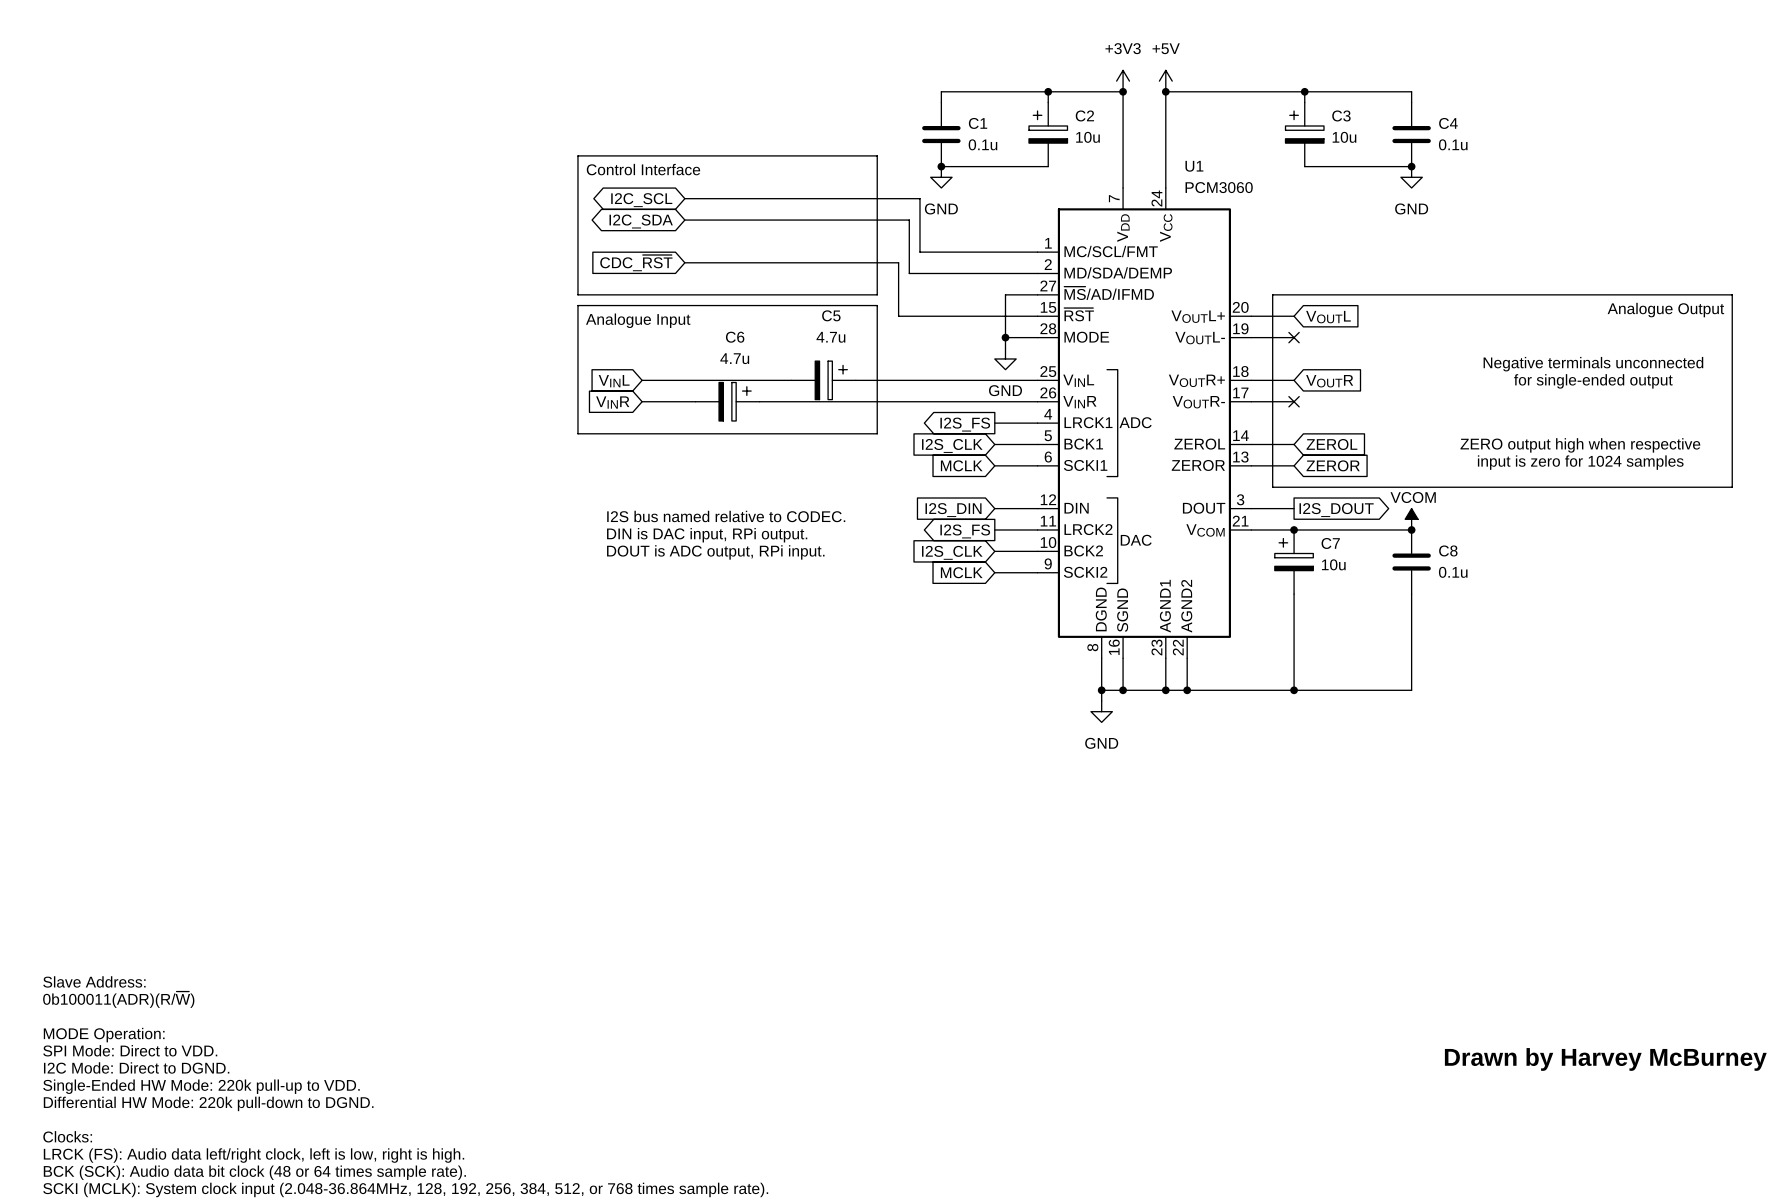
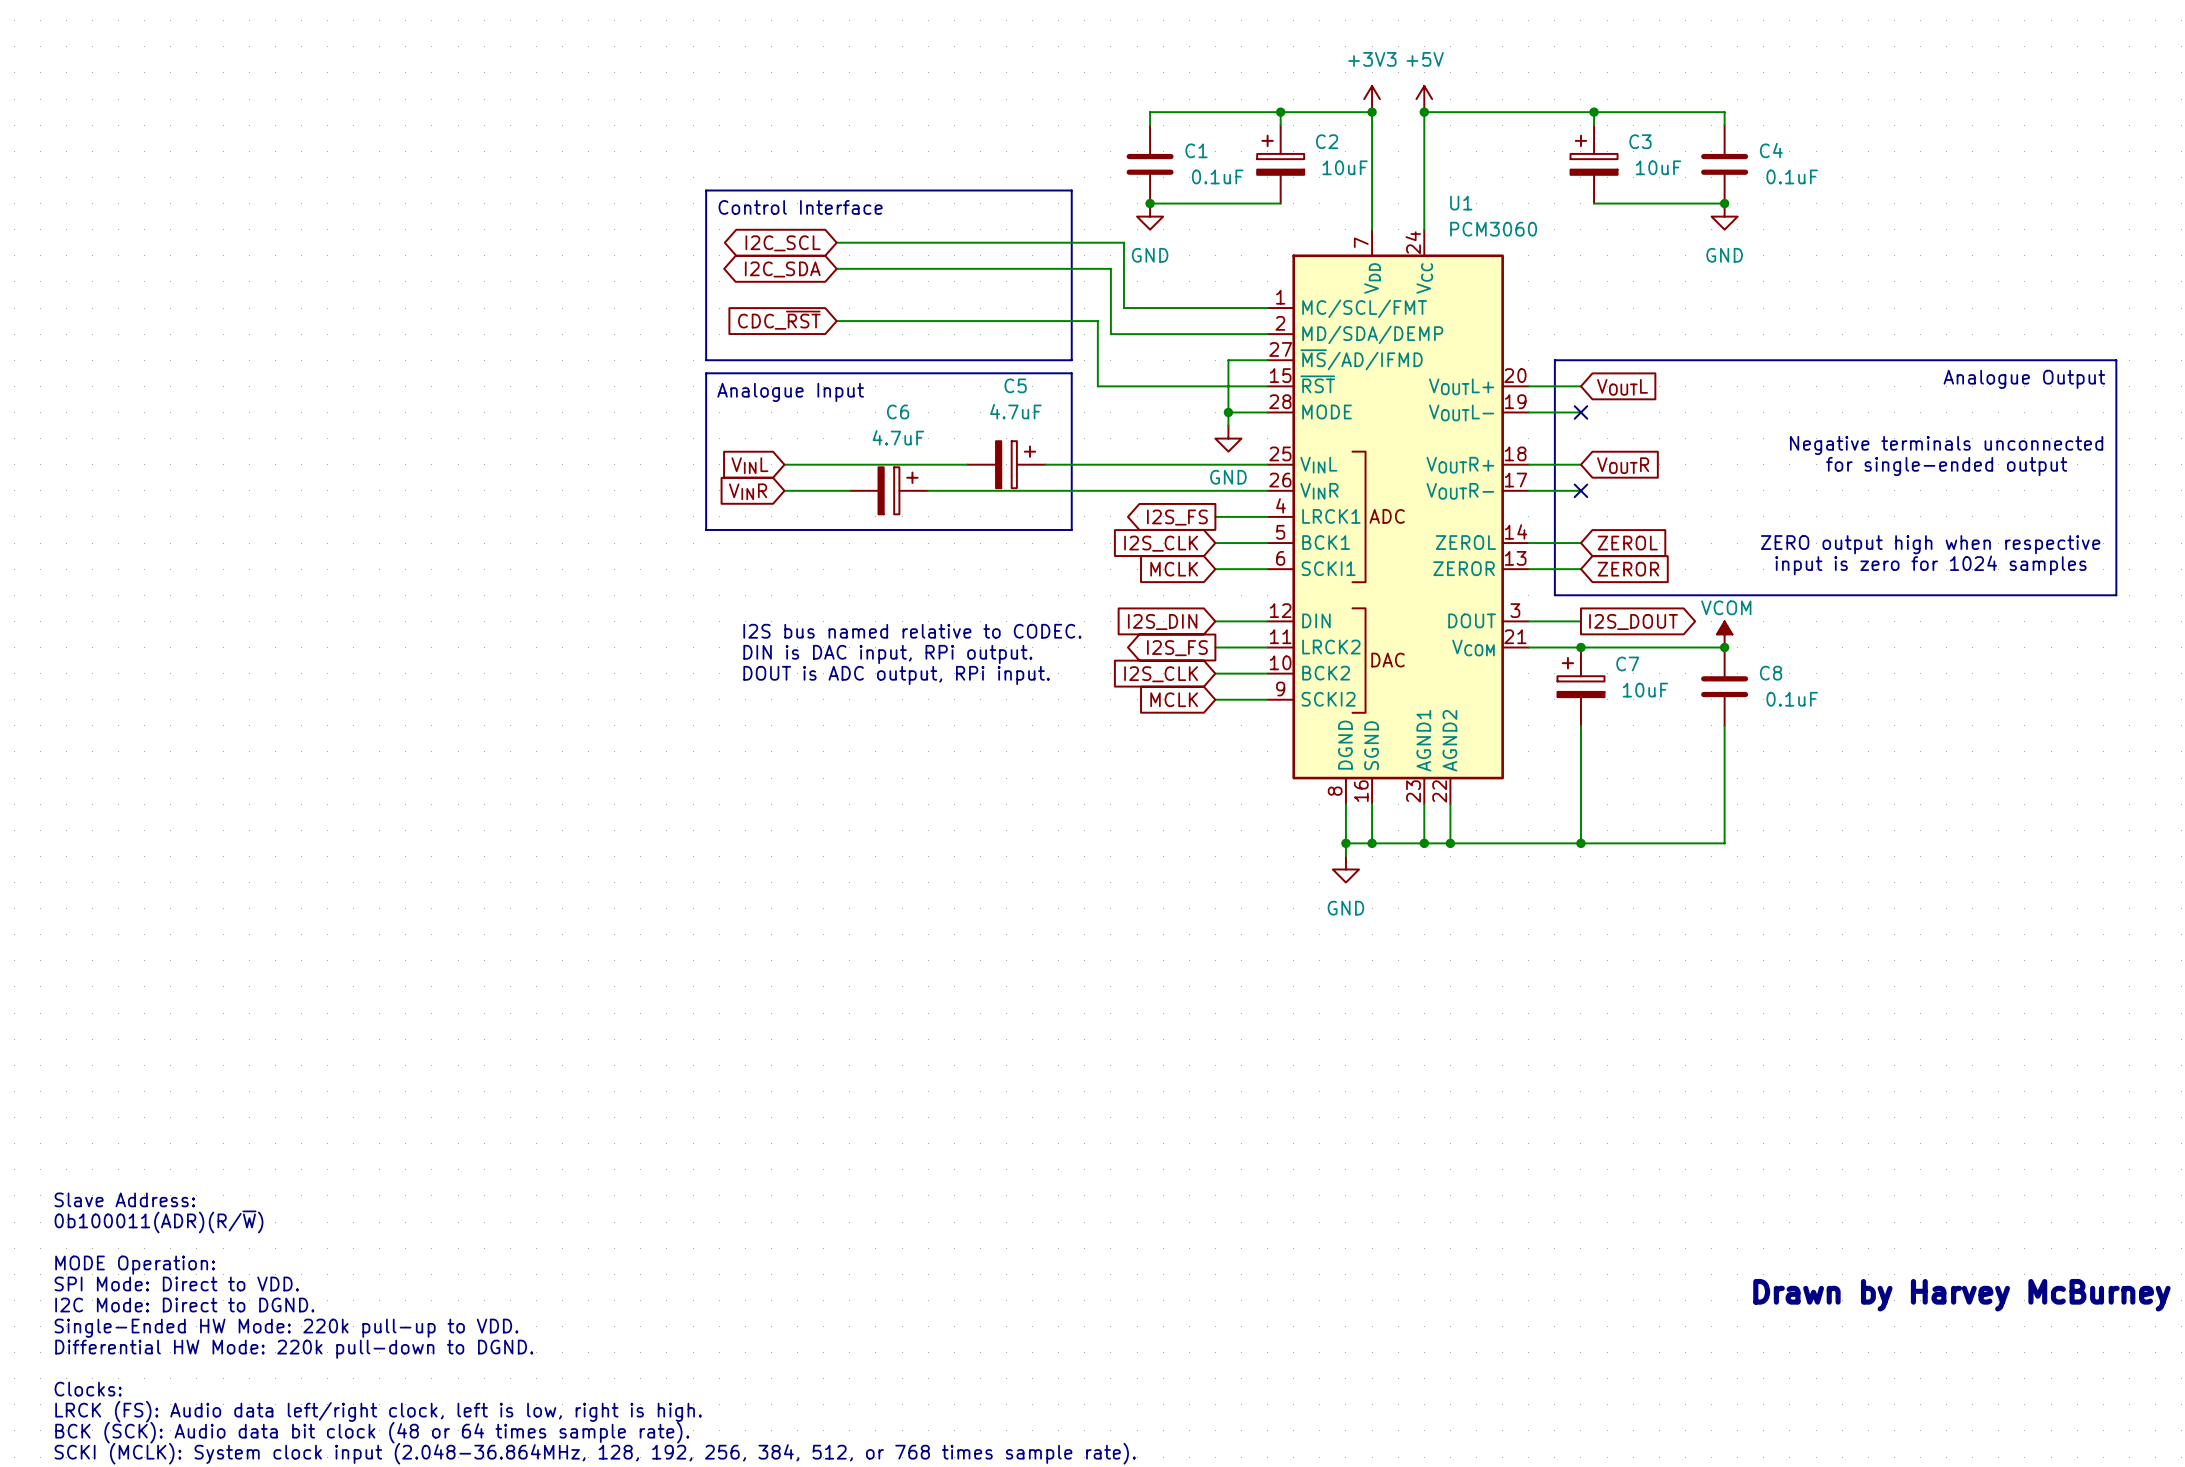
C2 value: 10u (1087, 137) -> 10uF (1345, 167)
C3 value: 10u (1344, 137) -> 10uF (1658, 167)
C1 value: 0.1u (982, 144) -> 0.1uF (1217, 176)
C4 value: 0.1u (1453, 144) -> 0.1uF (1792, 176)
C5 value: 4.7u (830, 337) -> 4.7uF (1015, 411)
C6 value: 4.7u (734, 358) -> 4.7uF (898, 437)
C7 value: 10u (1333, 564) -> 10uF (1645, 690)
C8 value: 0.1u (1453, 572) -> 0.1uF (1792, 699)

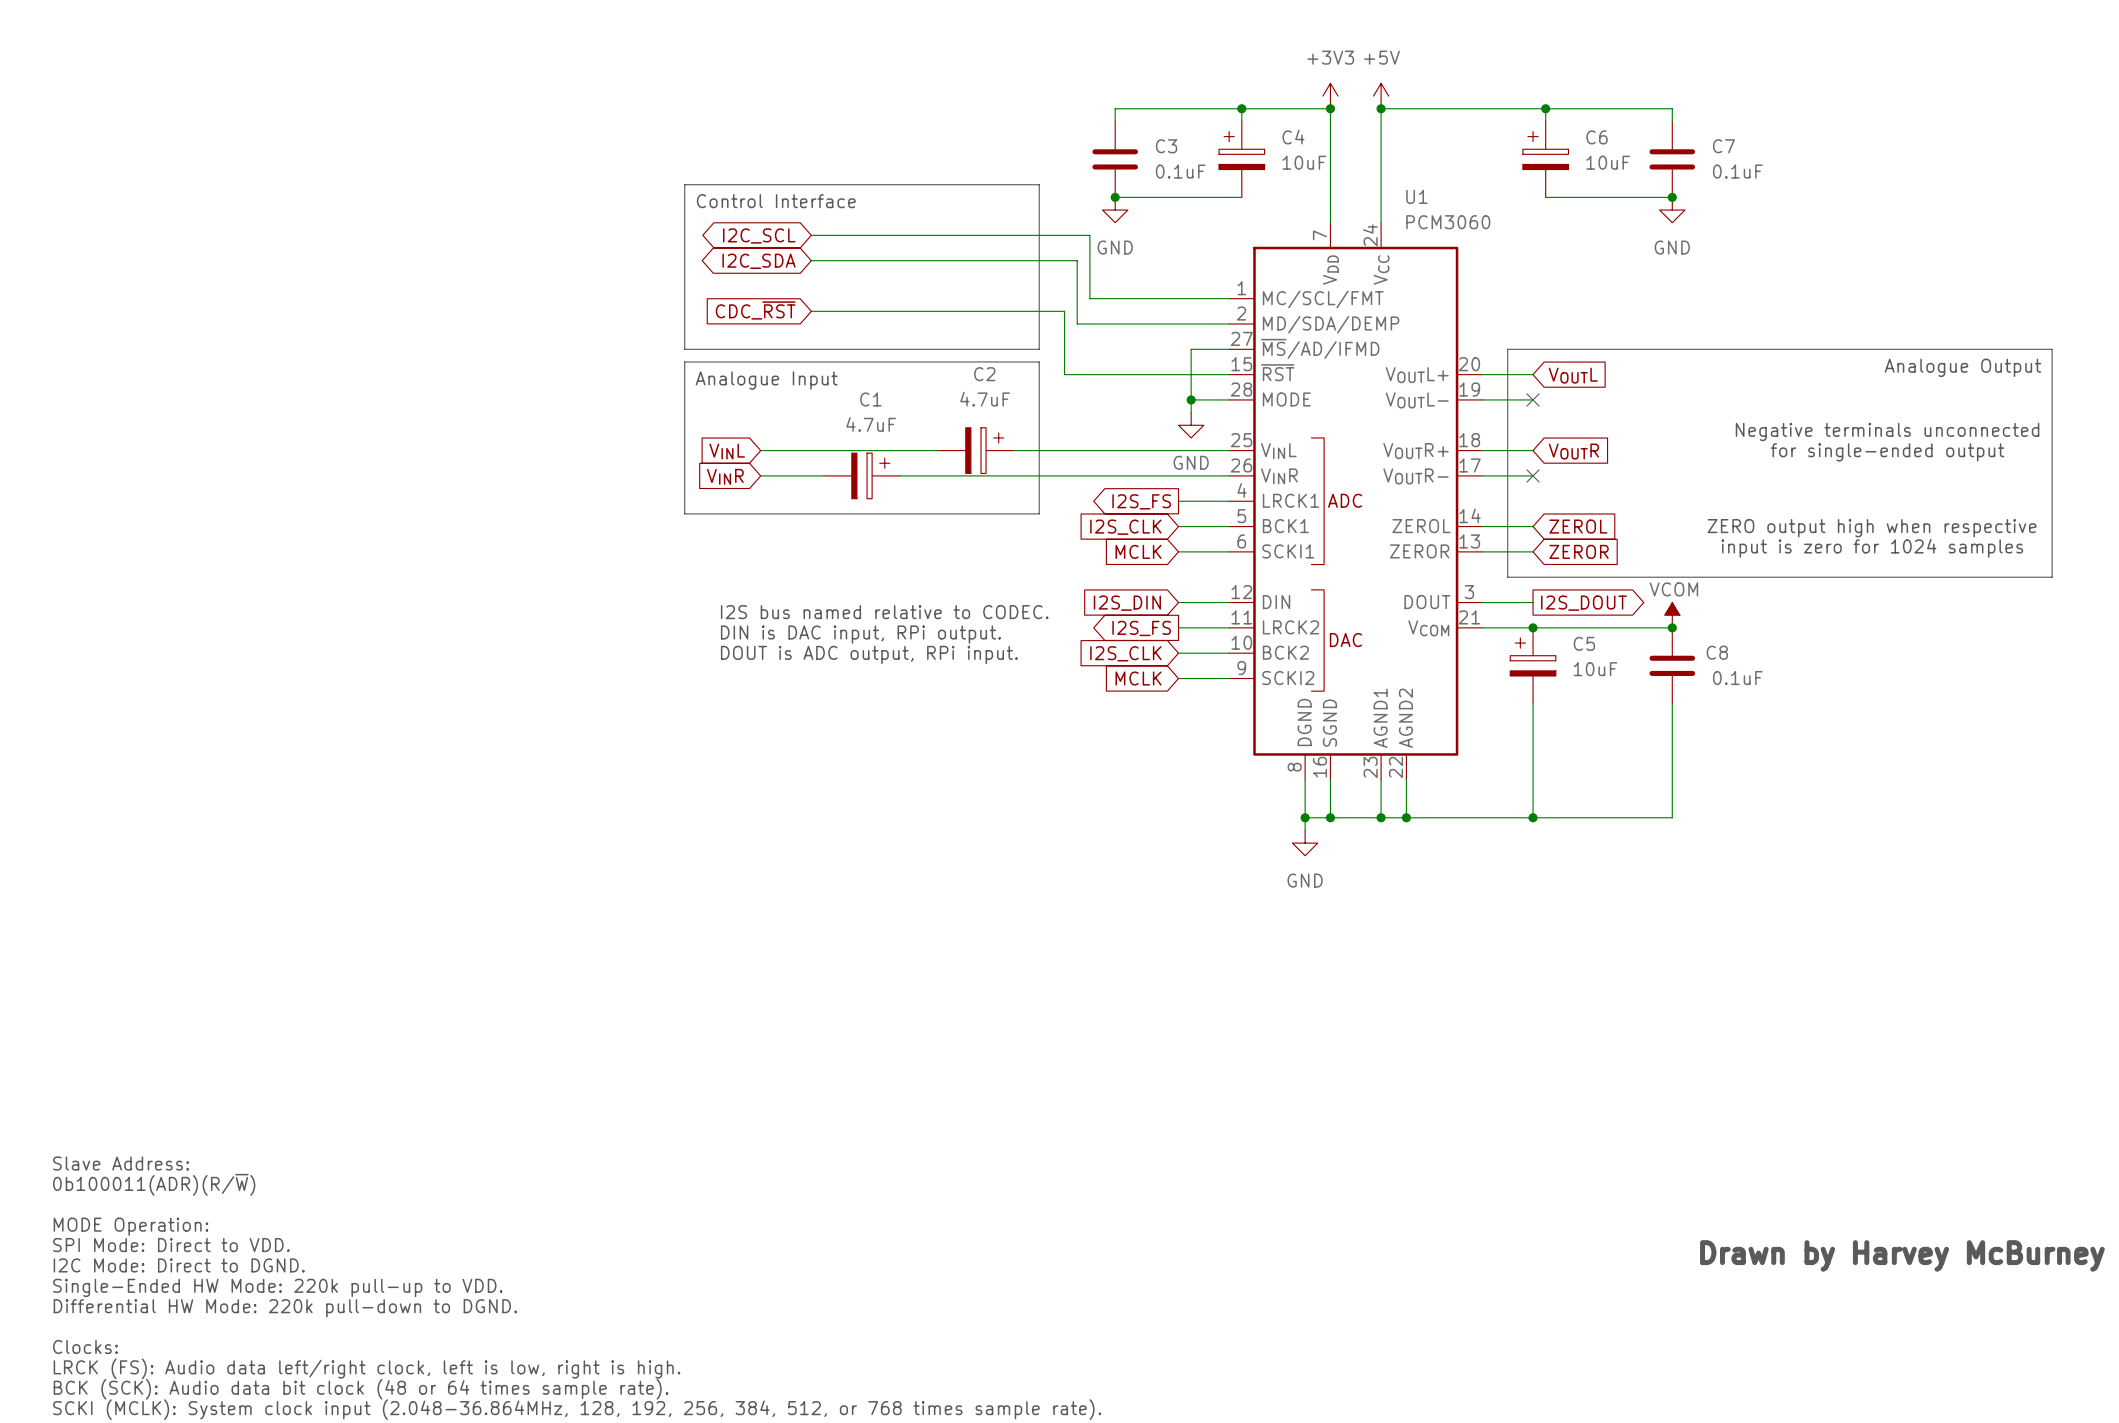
C2 name: C2 (1327, 141) -> C4 (1293, 137)
C3 name: C3 (1640, 141) -> C6 (1597, 137)
C1 name: C1 (1196, 150) -> C3 (1166, 146)
C4 name: C4 (1771, 150) -> C7 (1723, 146)
C5 name: C5 (1015, 385) -> C2 (984, 374)
C6 name: C6 (898, 411) -> C1 (870, 399)
C7 name: C7 (1627, 663) -> C5 (1584, 643)

